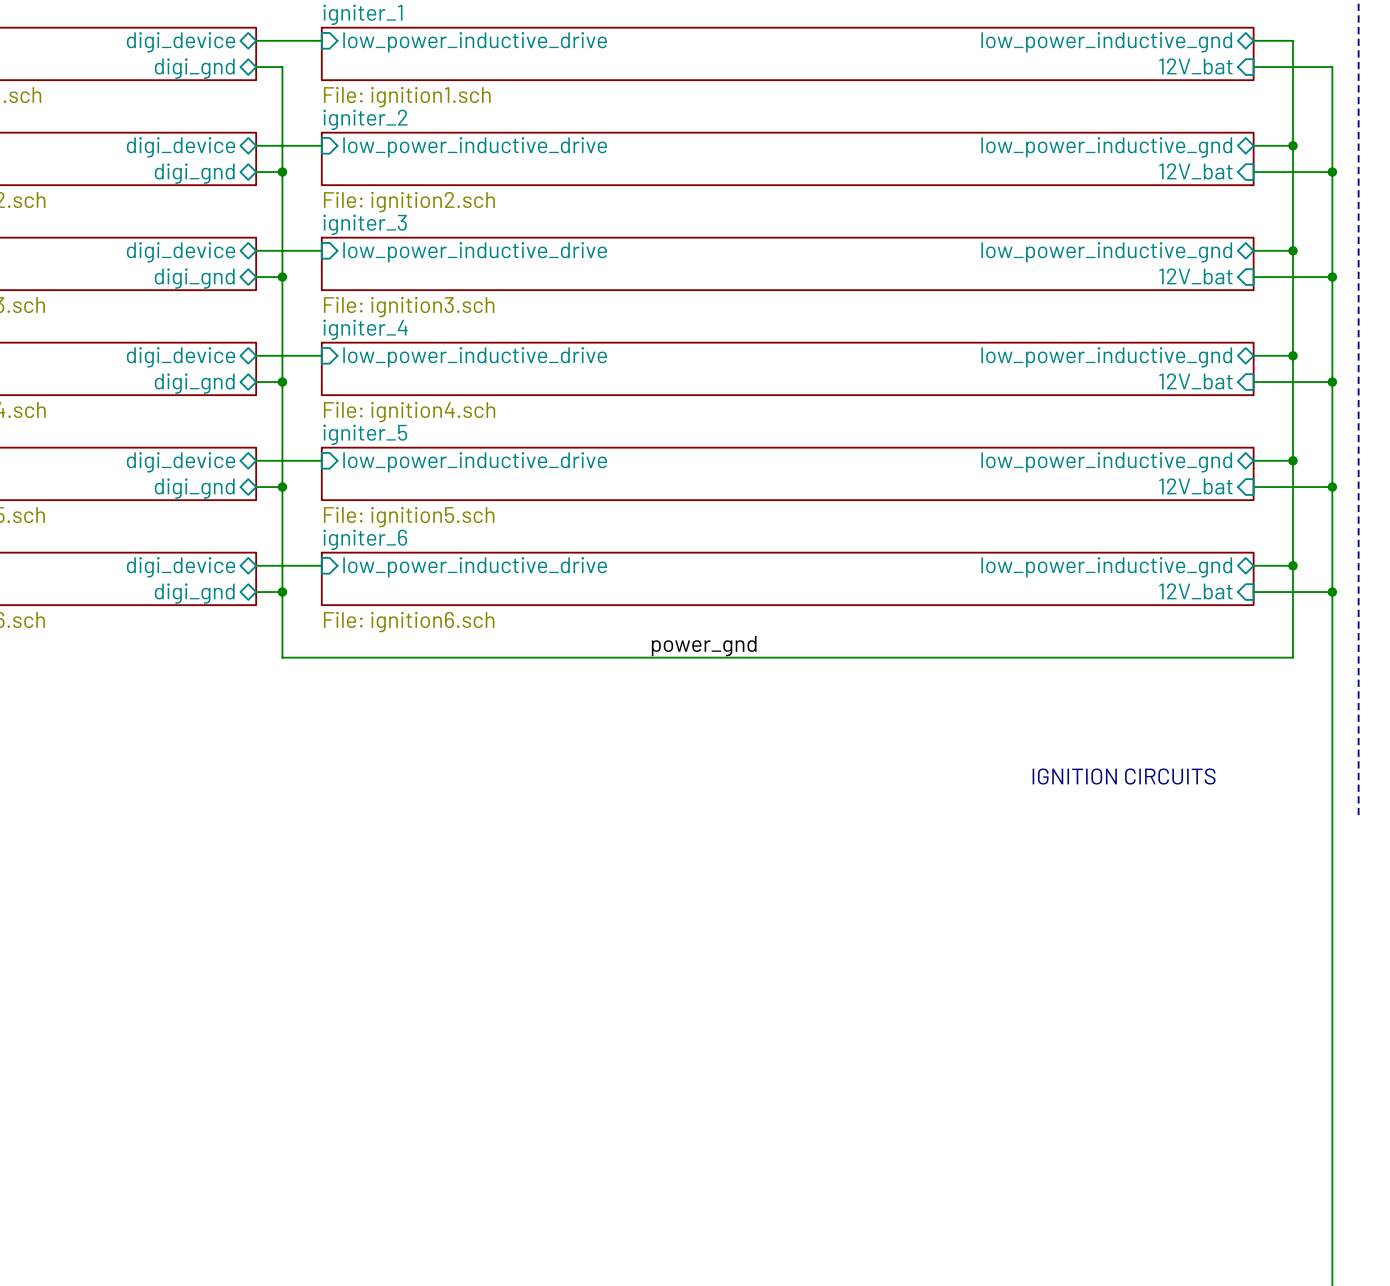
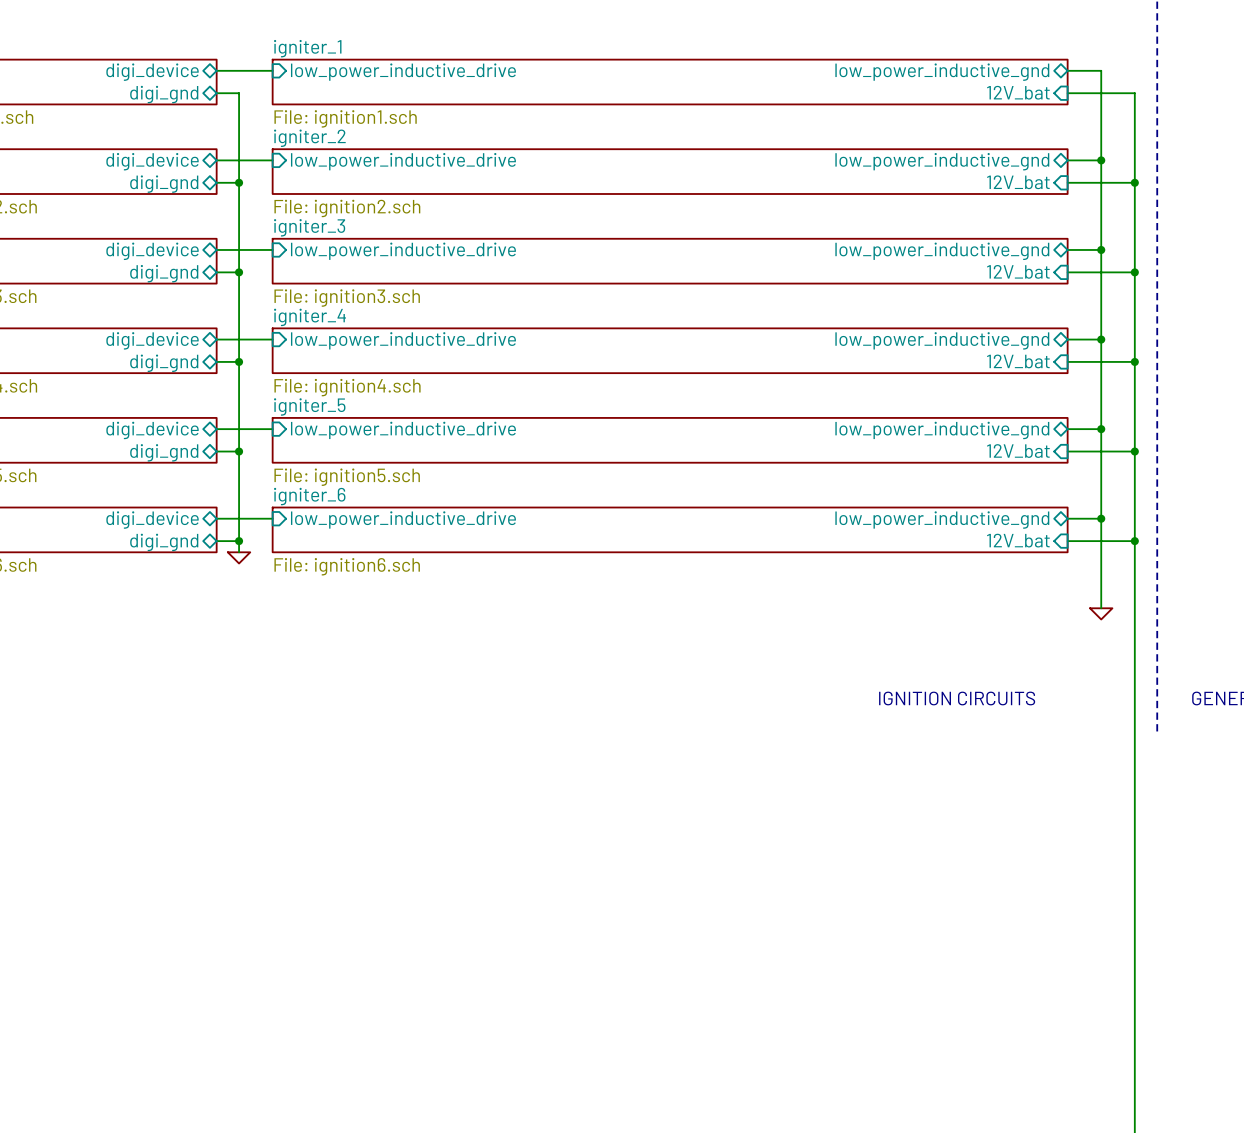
wire: (282, 605) (282, 657) (1292, 657) -> (1101, 608) (1101, 597)
power symbol: none -> (239, 557)
label: power_gnd (704, 646) -> none
power symbol: none -> (1101, 613)

